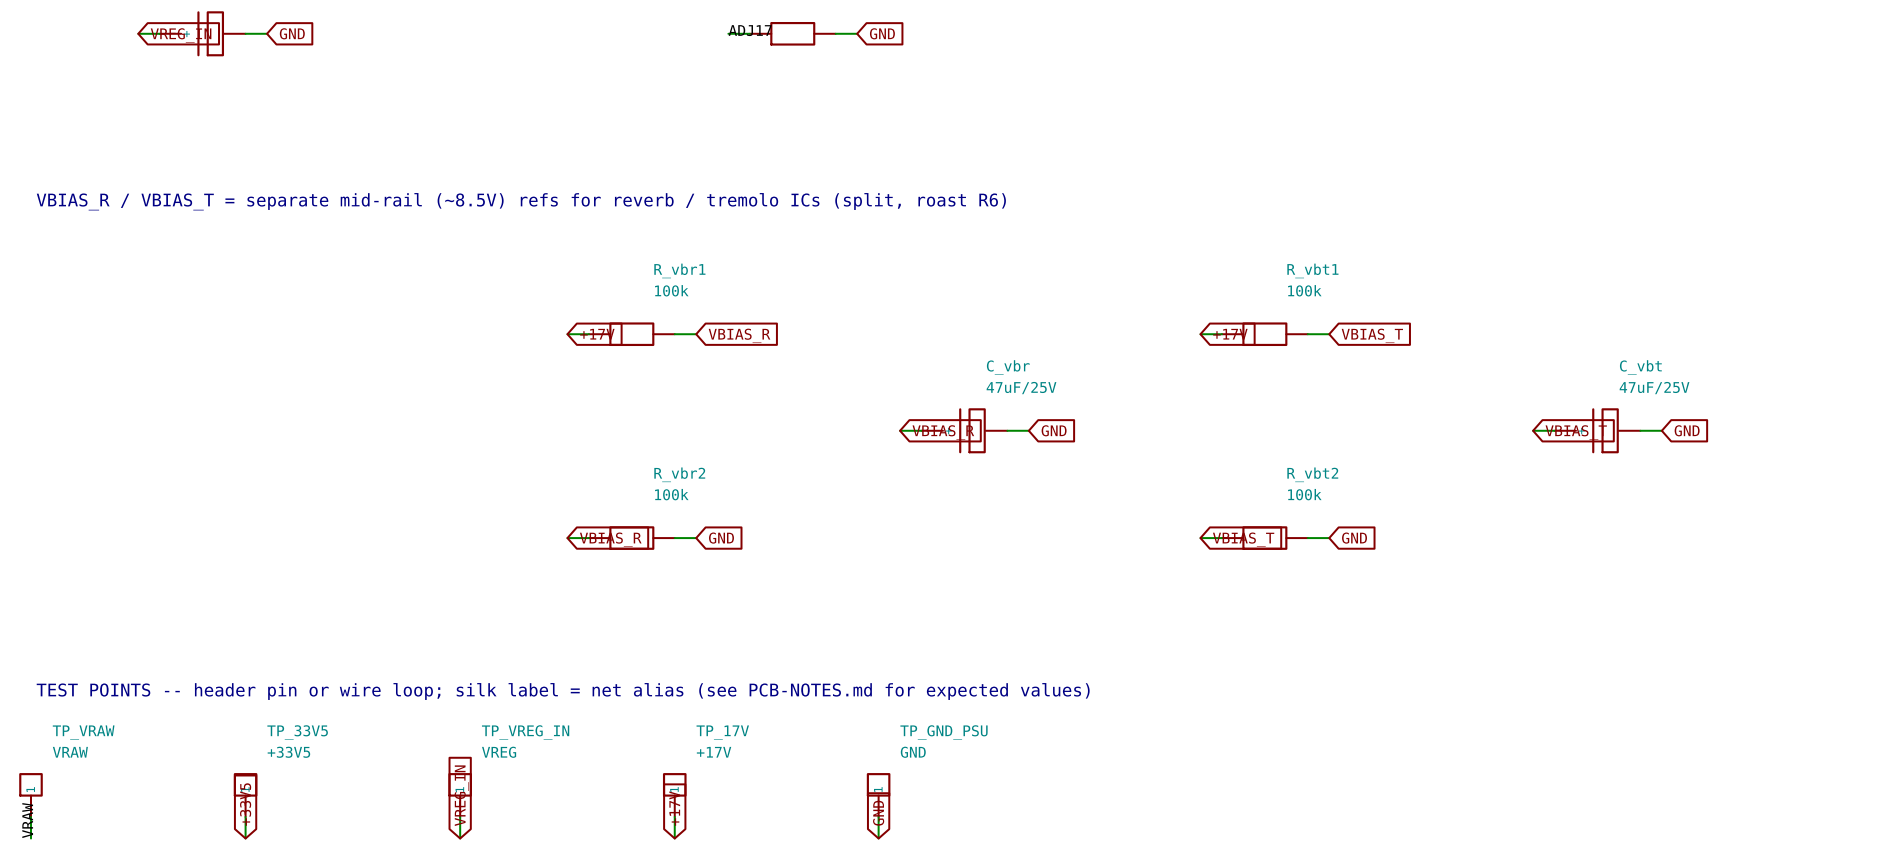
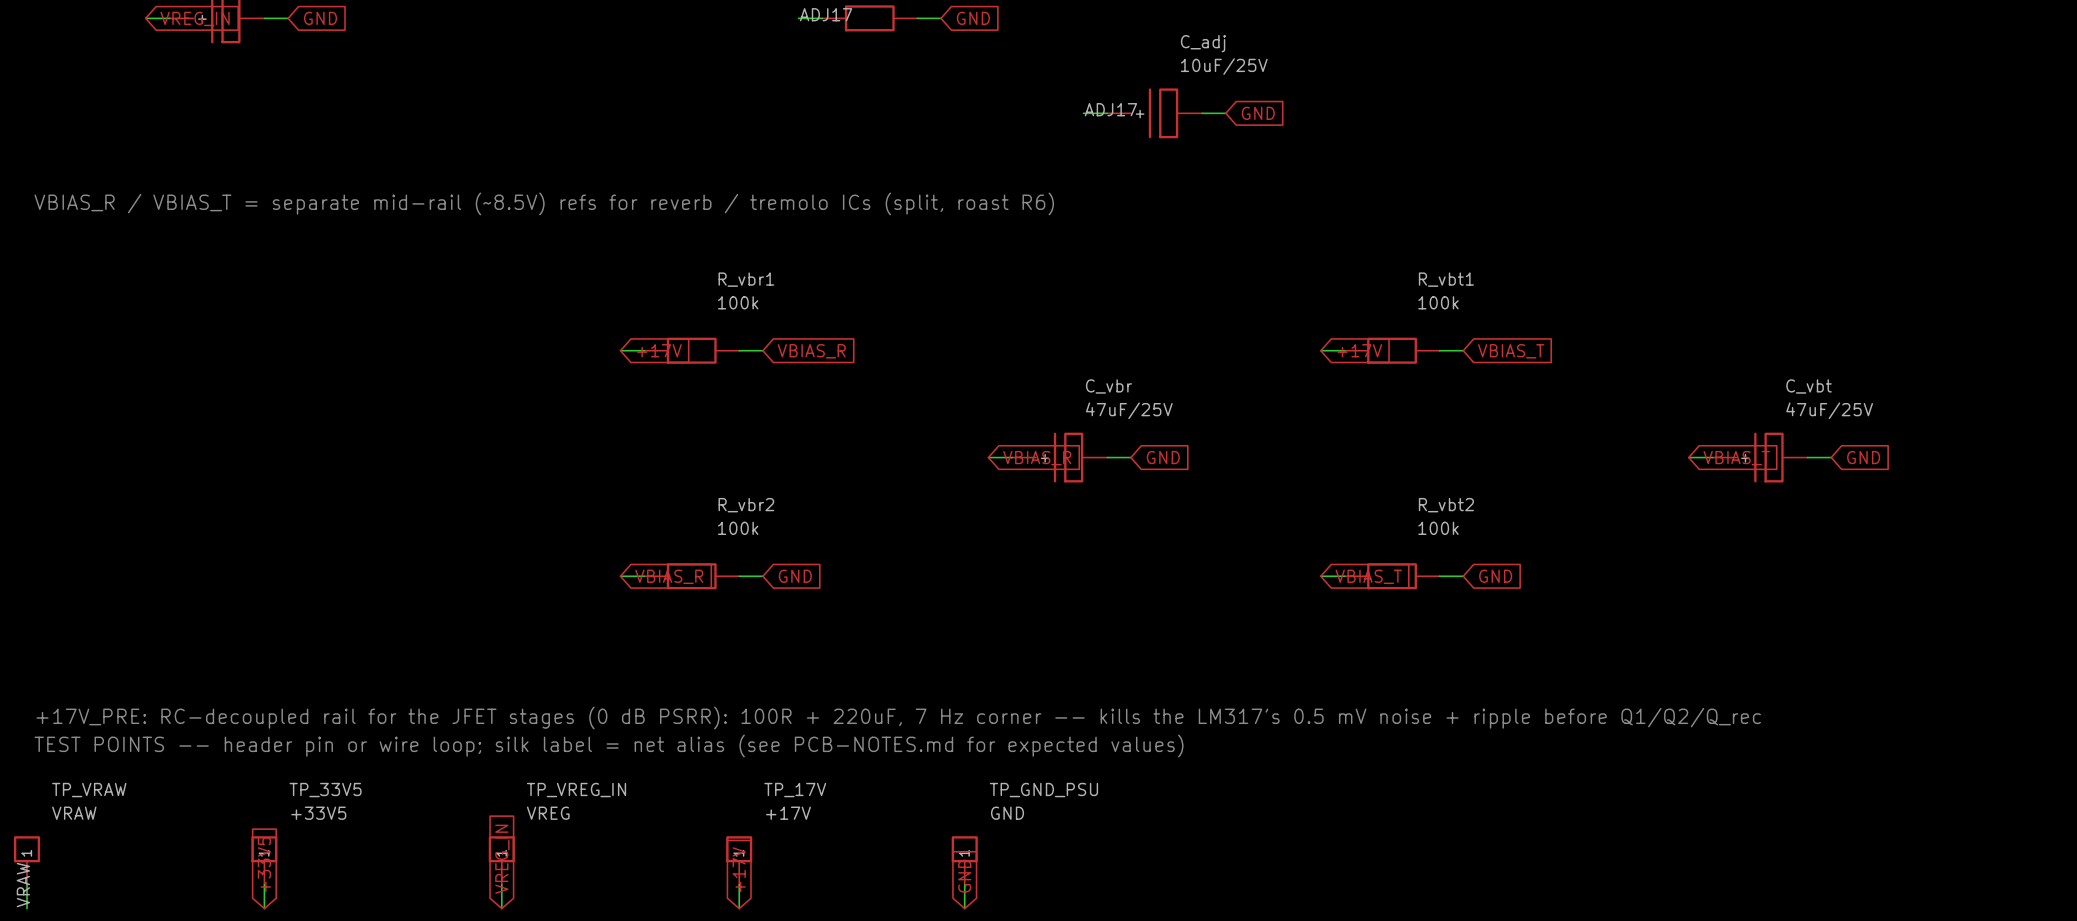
label: none -> ADJ17 (1110, 109)
wire: none -> (1083, 113) (1107, 113)
C_adj: none -> 10uF/25V (1154, 113)
wire: none -> (1202, 113) (1225, 113)
global label: none -> GND (1258, 113)
text: none -> +17V_PRE: RC-decoupled rail for the JFET stages (0 dB PSRR): 100R + 220uF, 7 Hz corner -- kills the LM317's 0.5 mV noise + ripple before Q1/Q2/Q_rec (898, 717)

